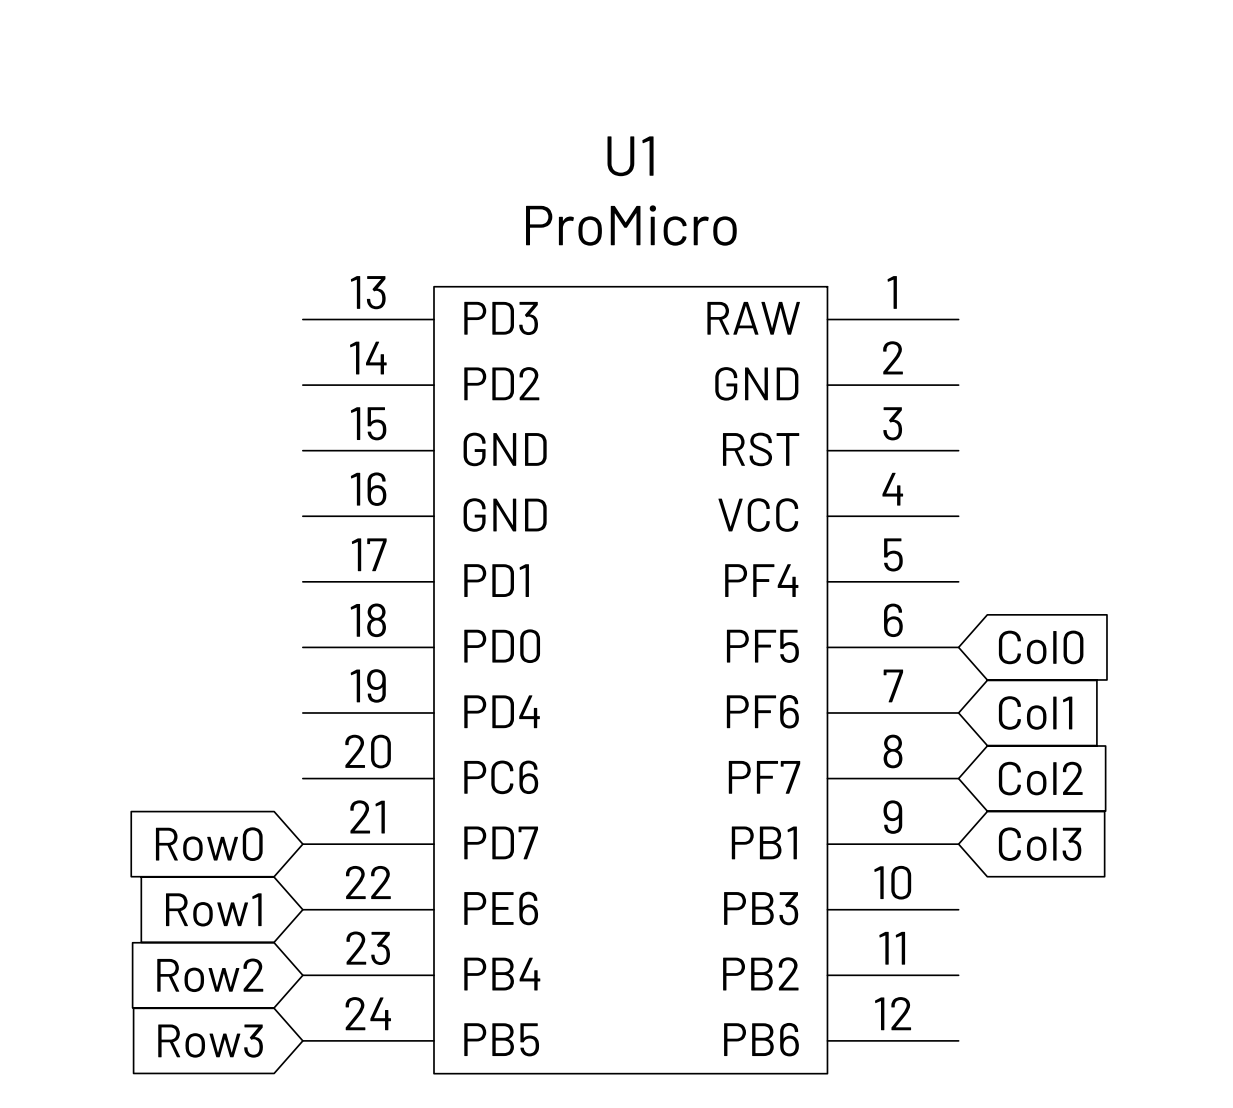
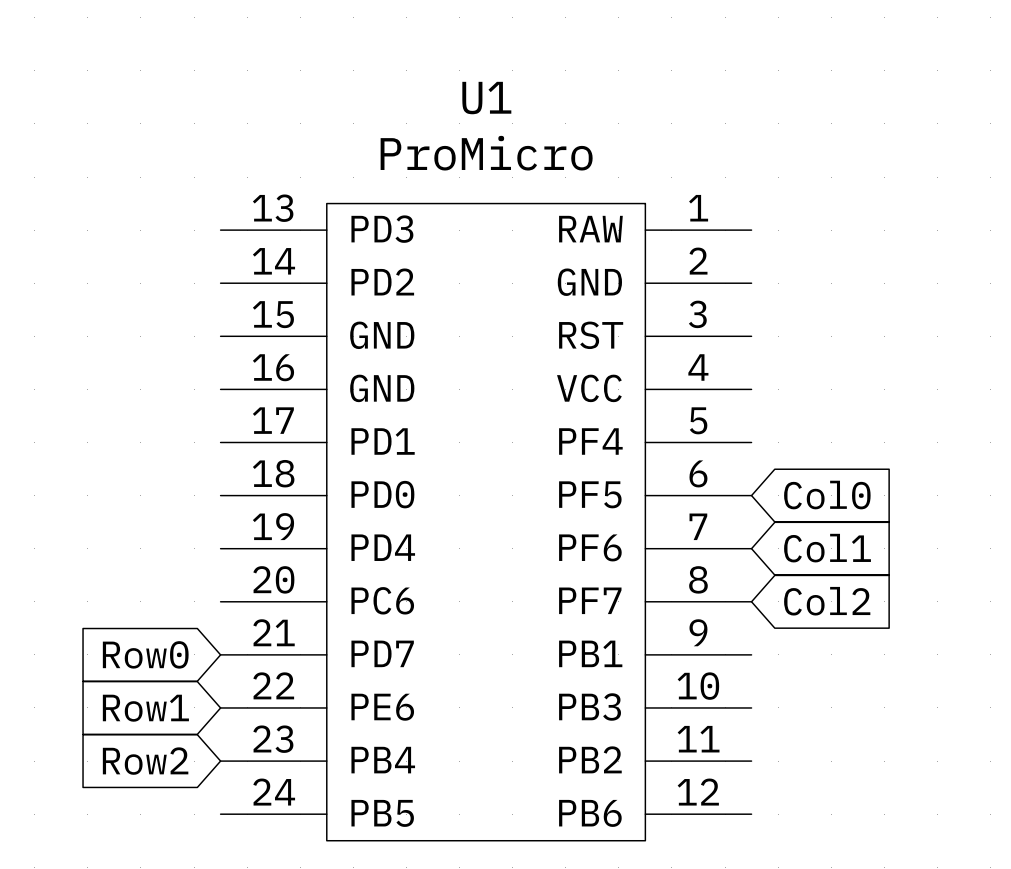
global label: Col3 (1040, 844) -> none
global label: Row3 (210, 1041) -> none

